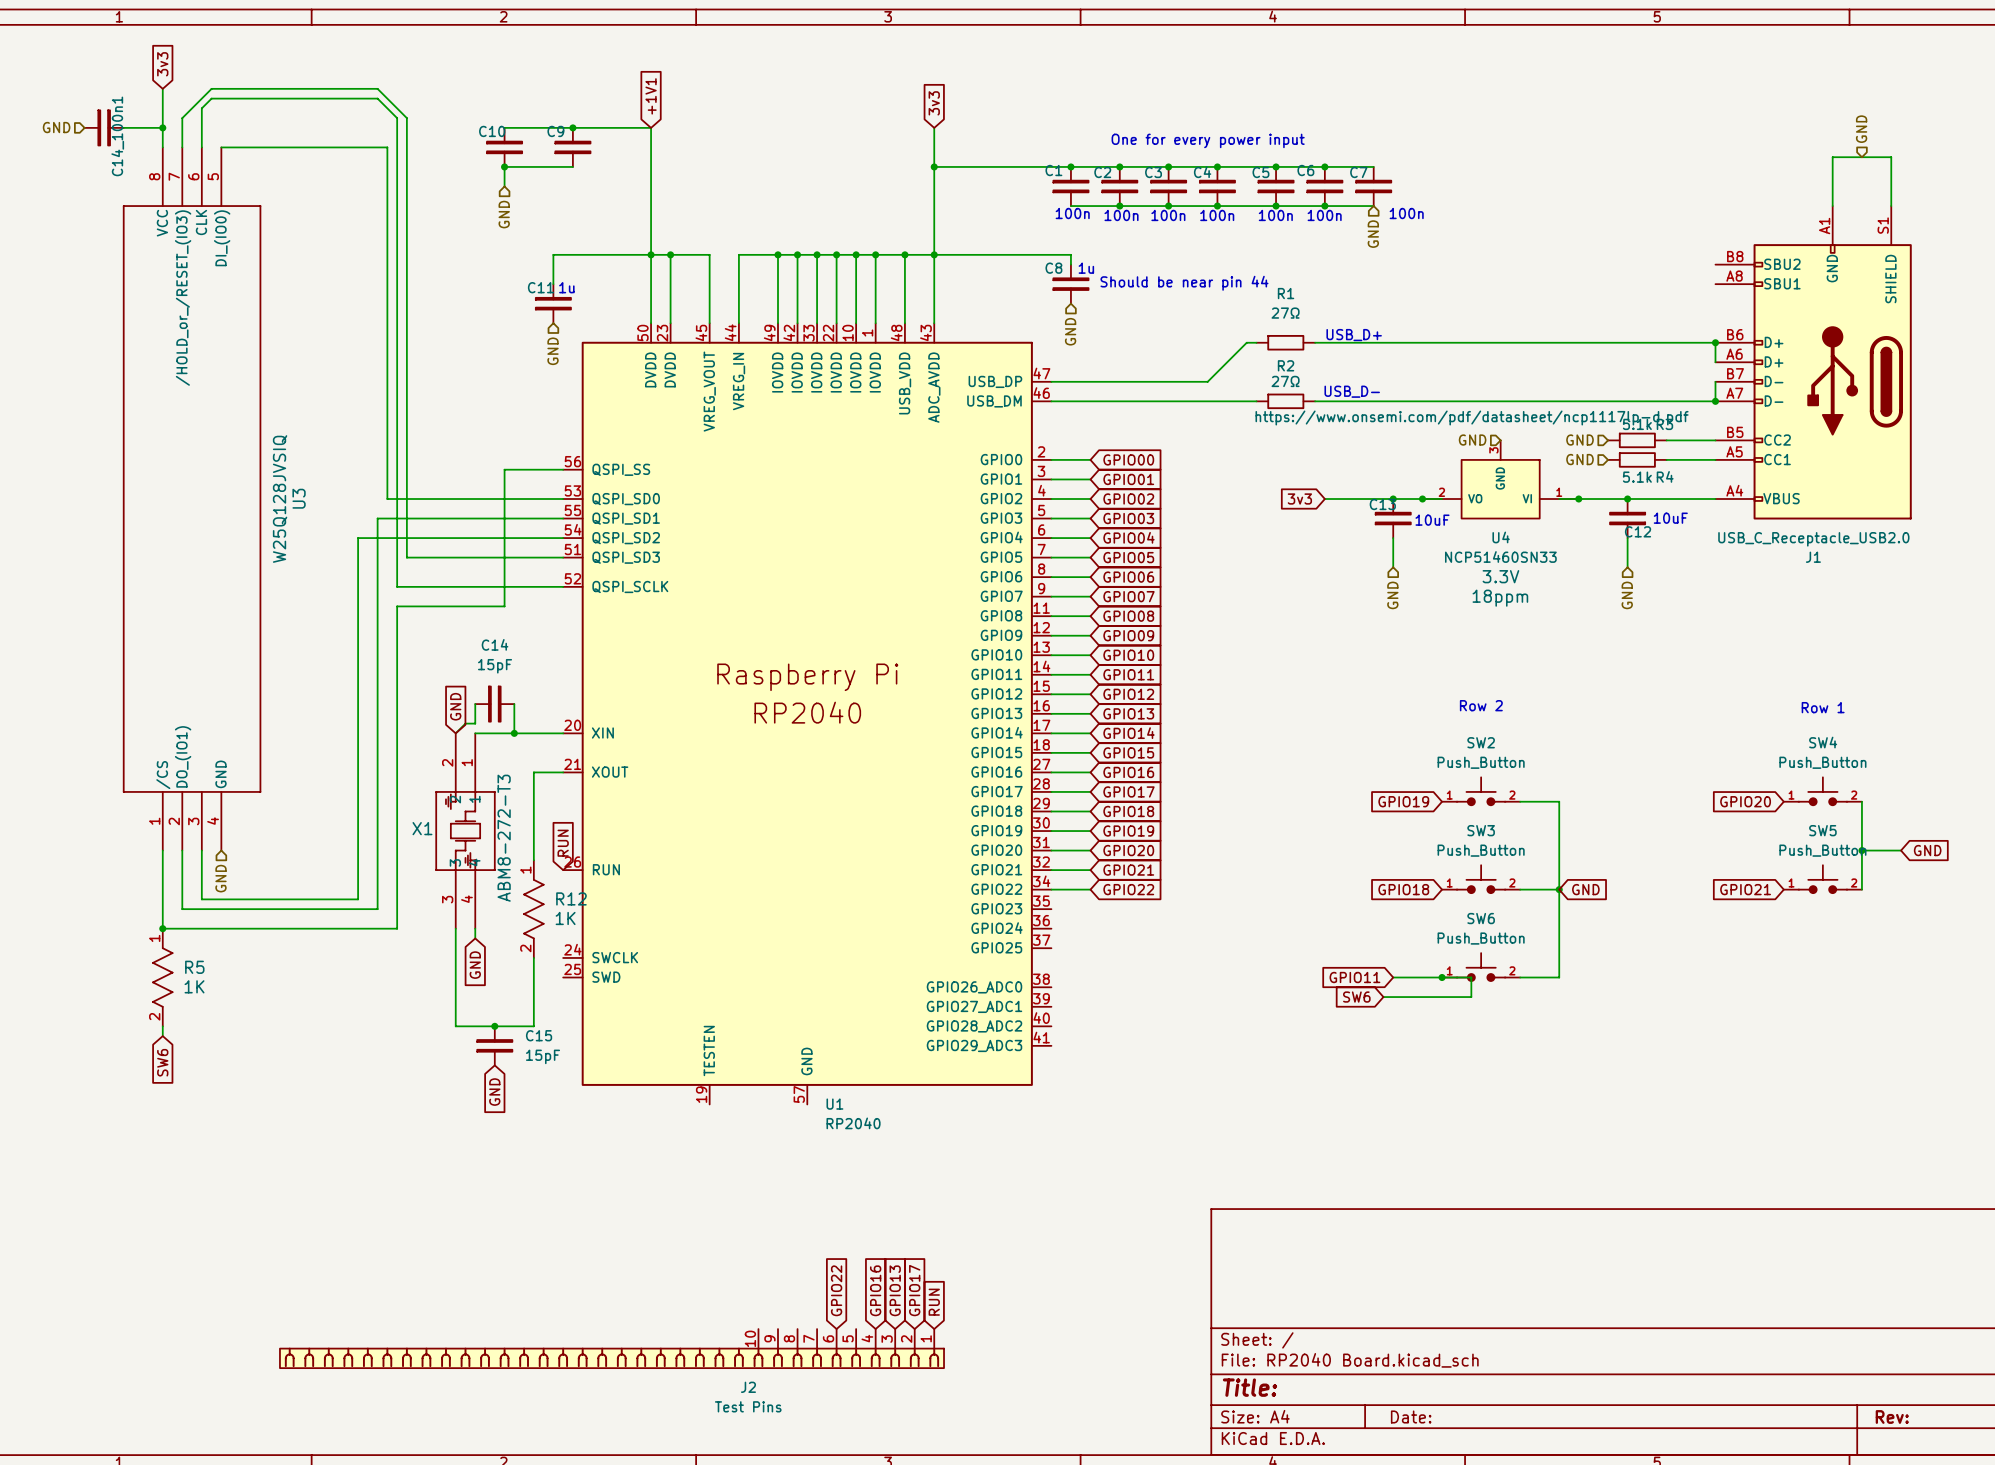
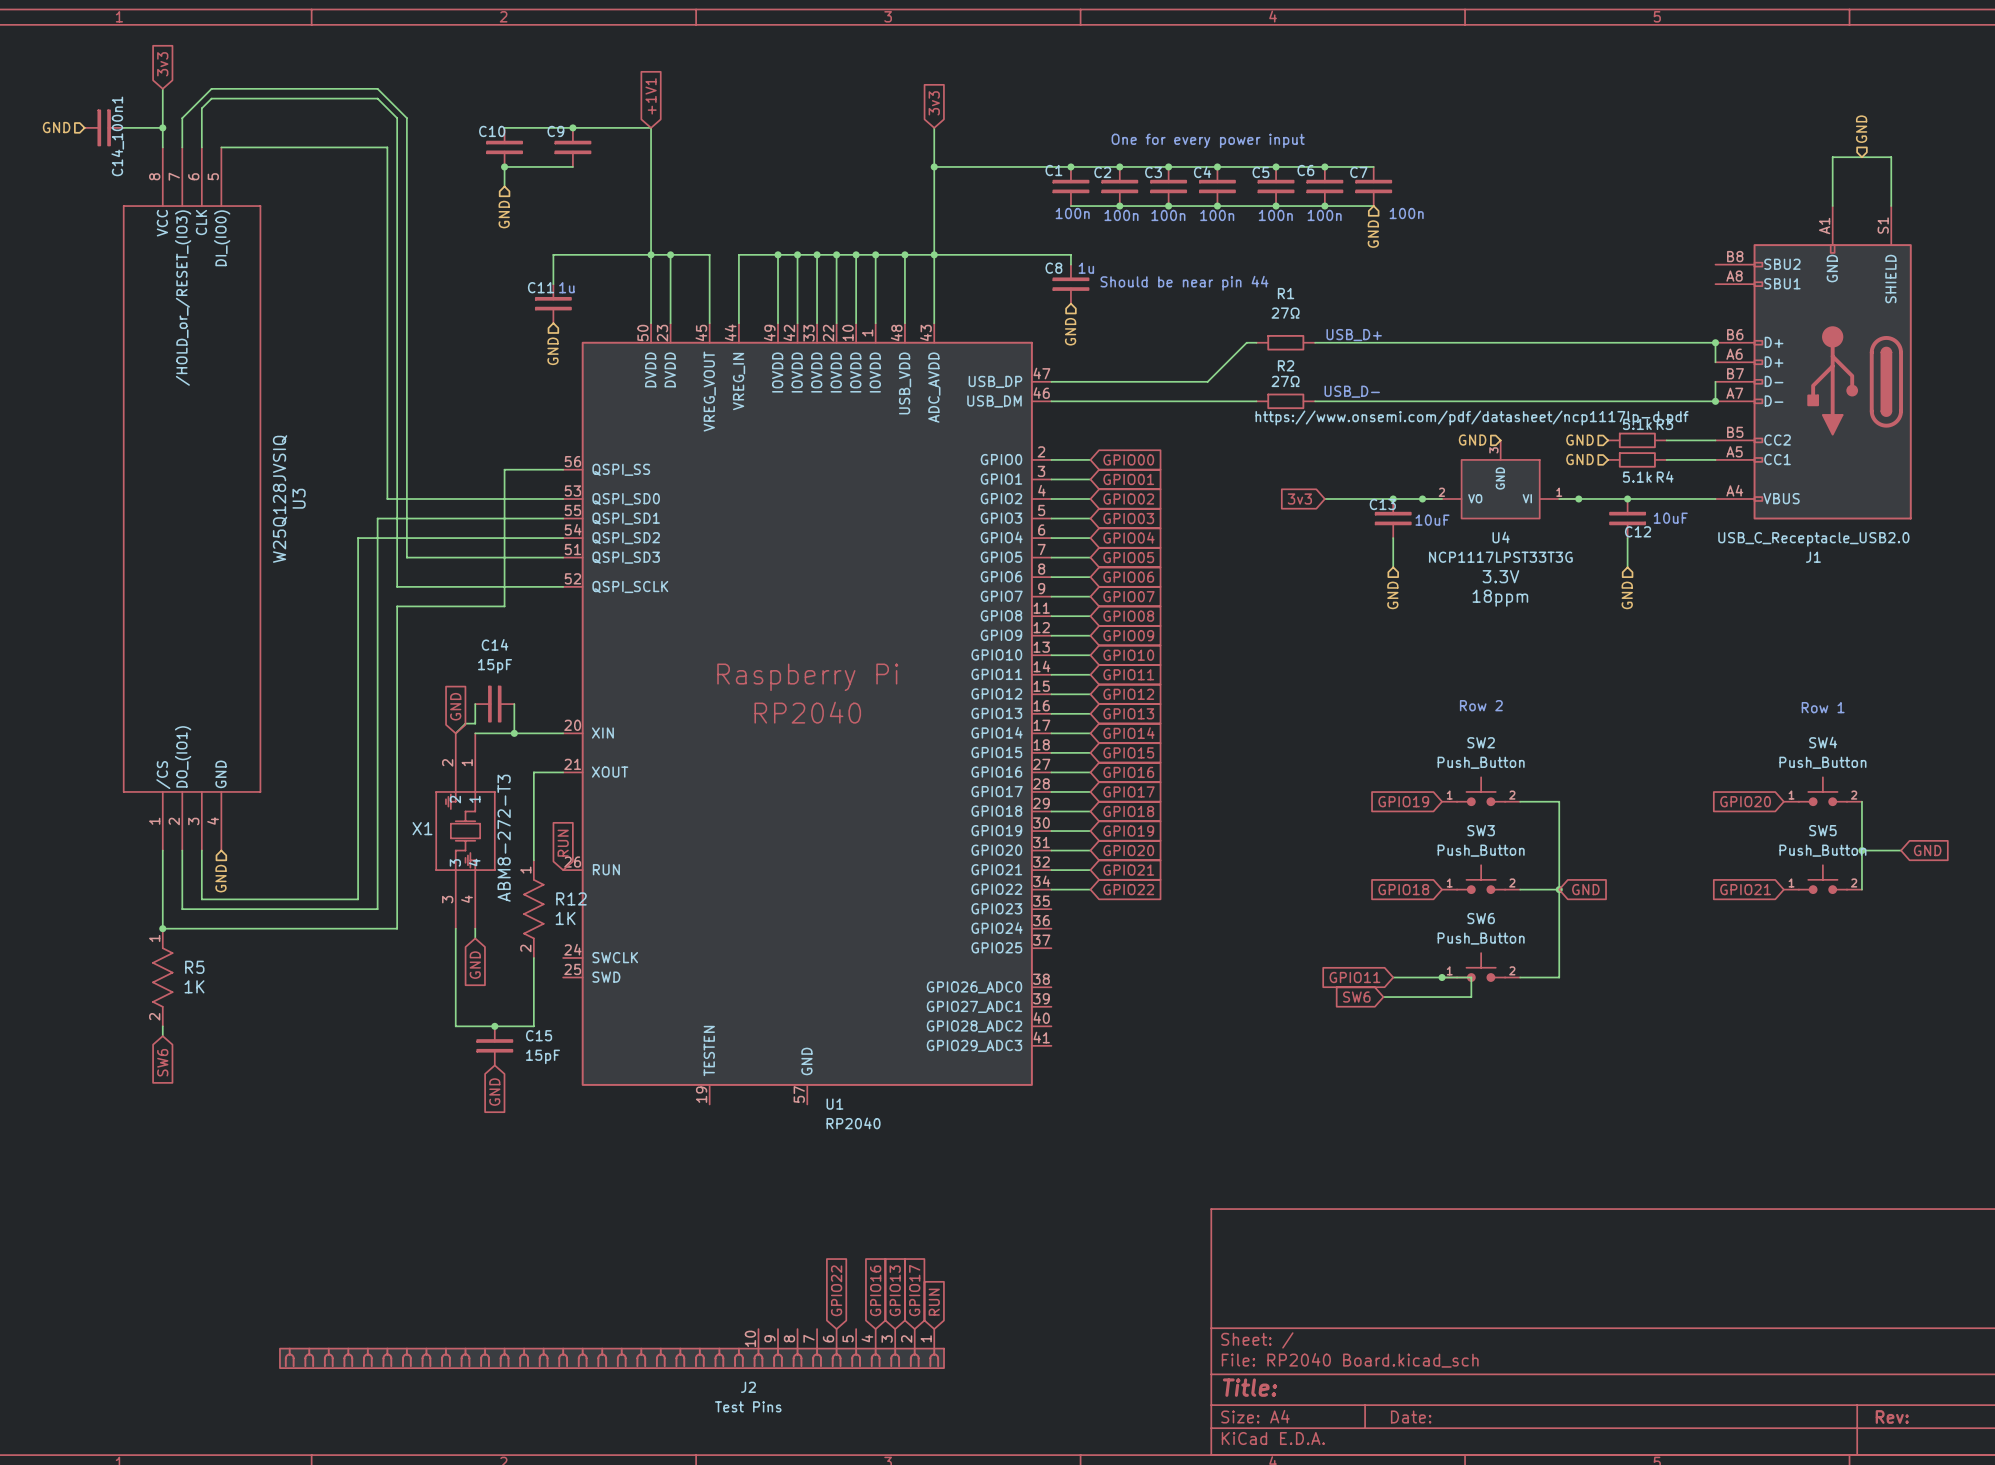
U4 value: NCP51460SN33 (1500, 556) -> NCP1117LPST33T3G (1500, 557)

